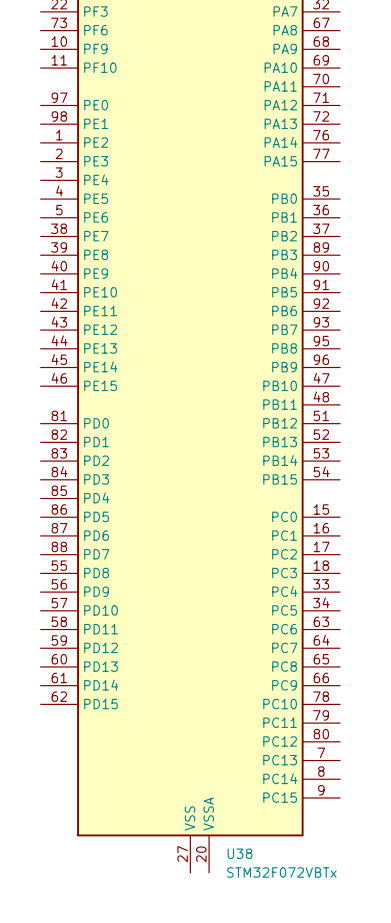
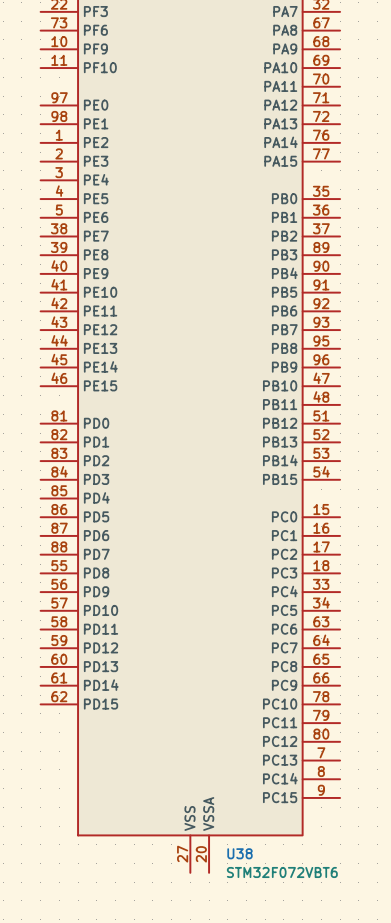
U38 value: STM32F072VBTx (281, 872) -> STM32F072VBT6 (282, 872)

